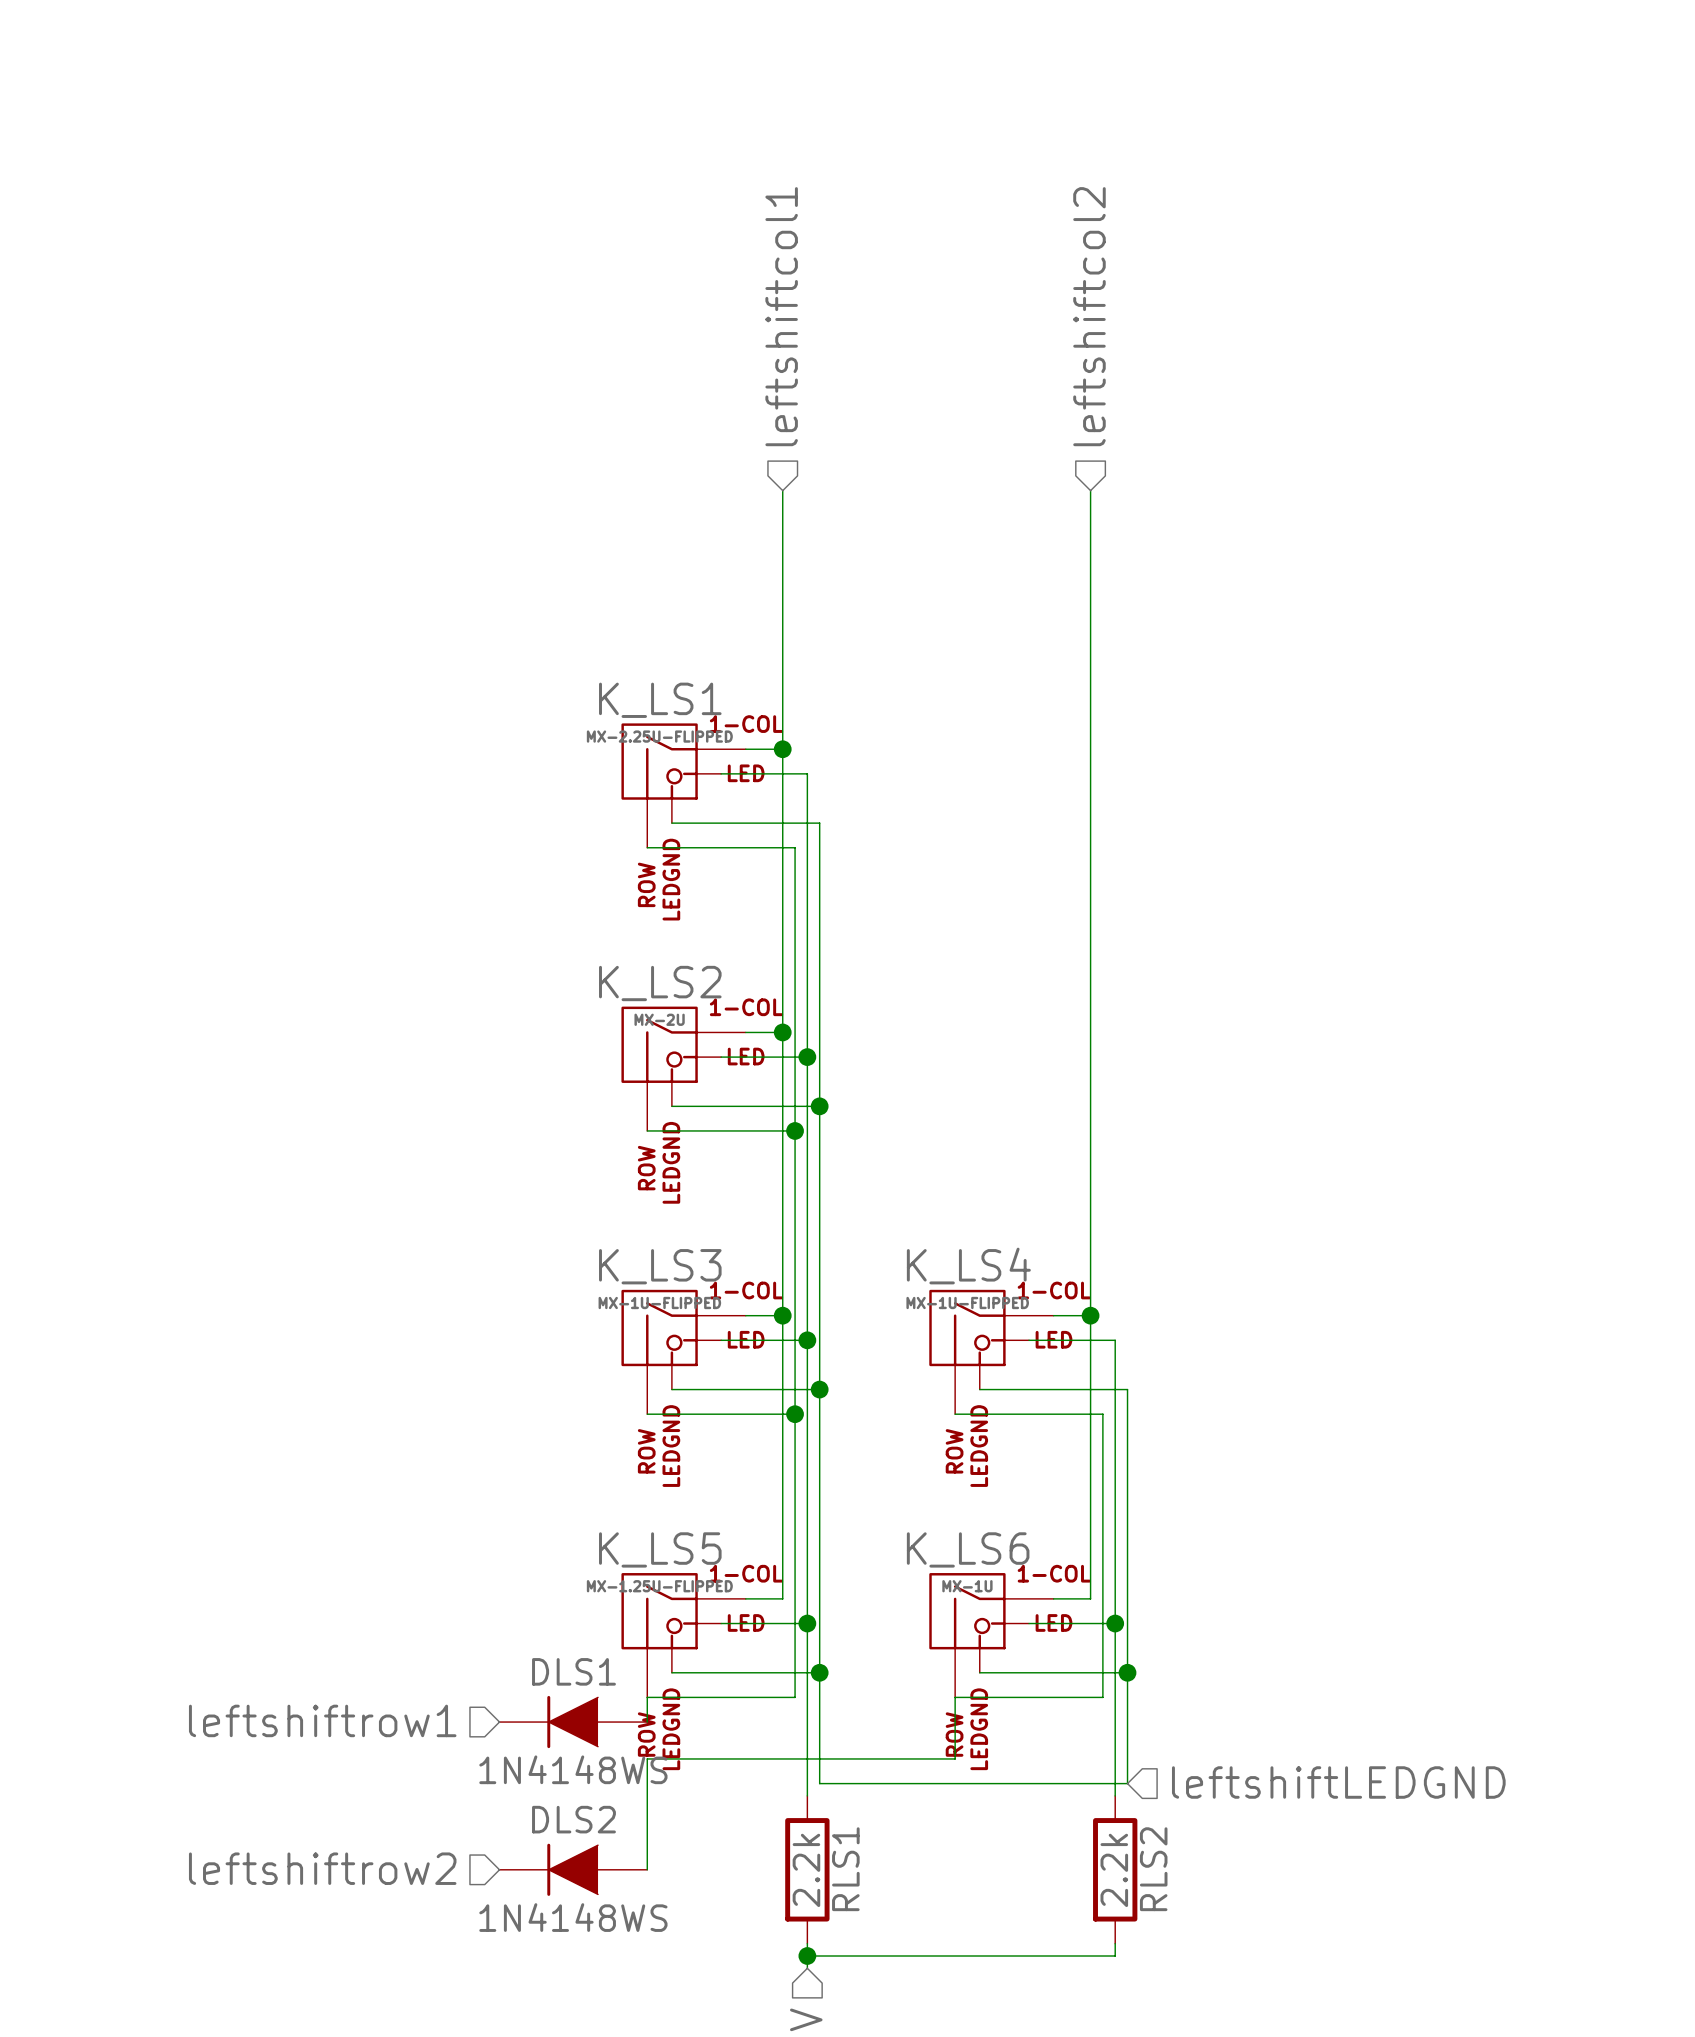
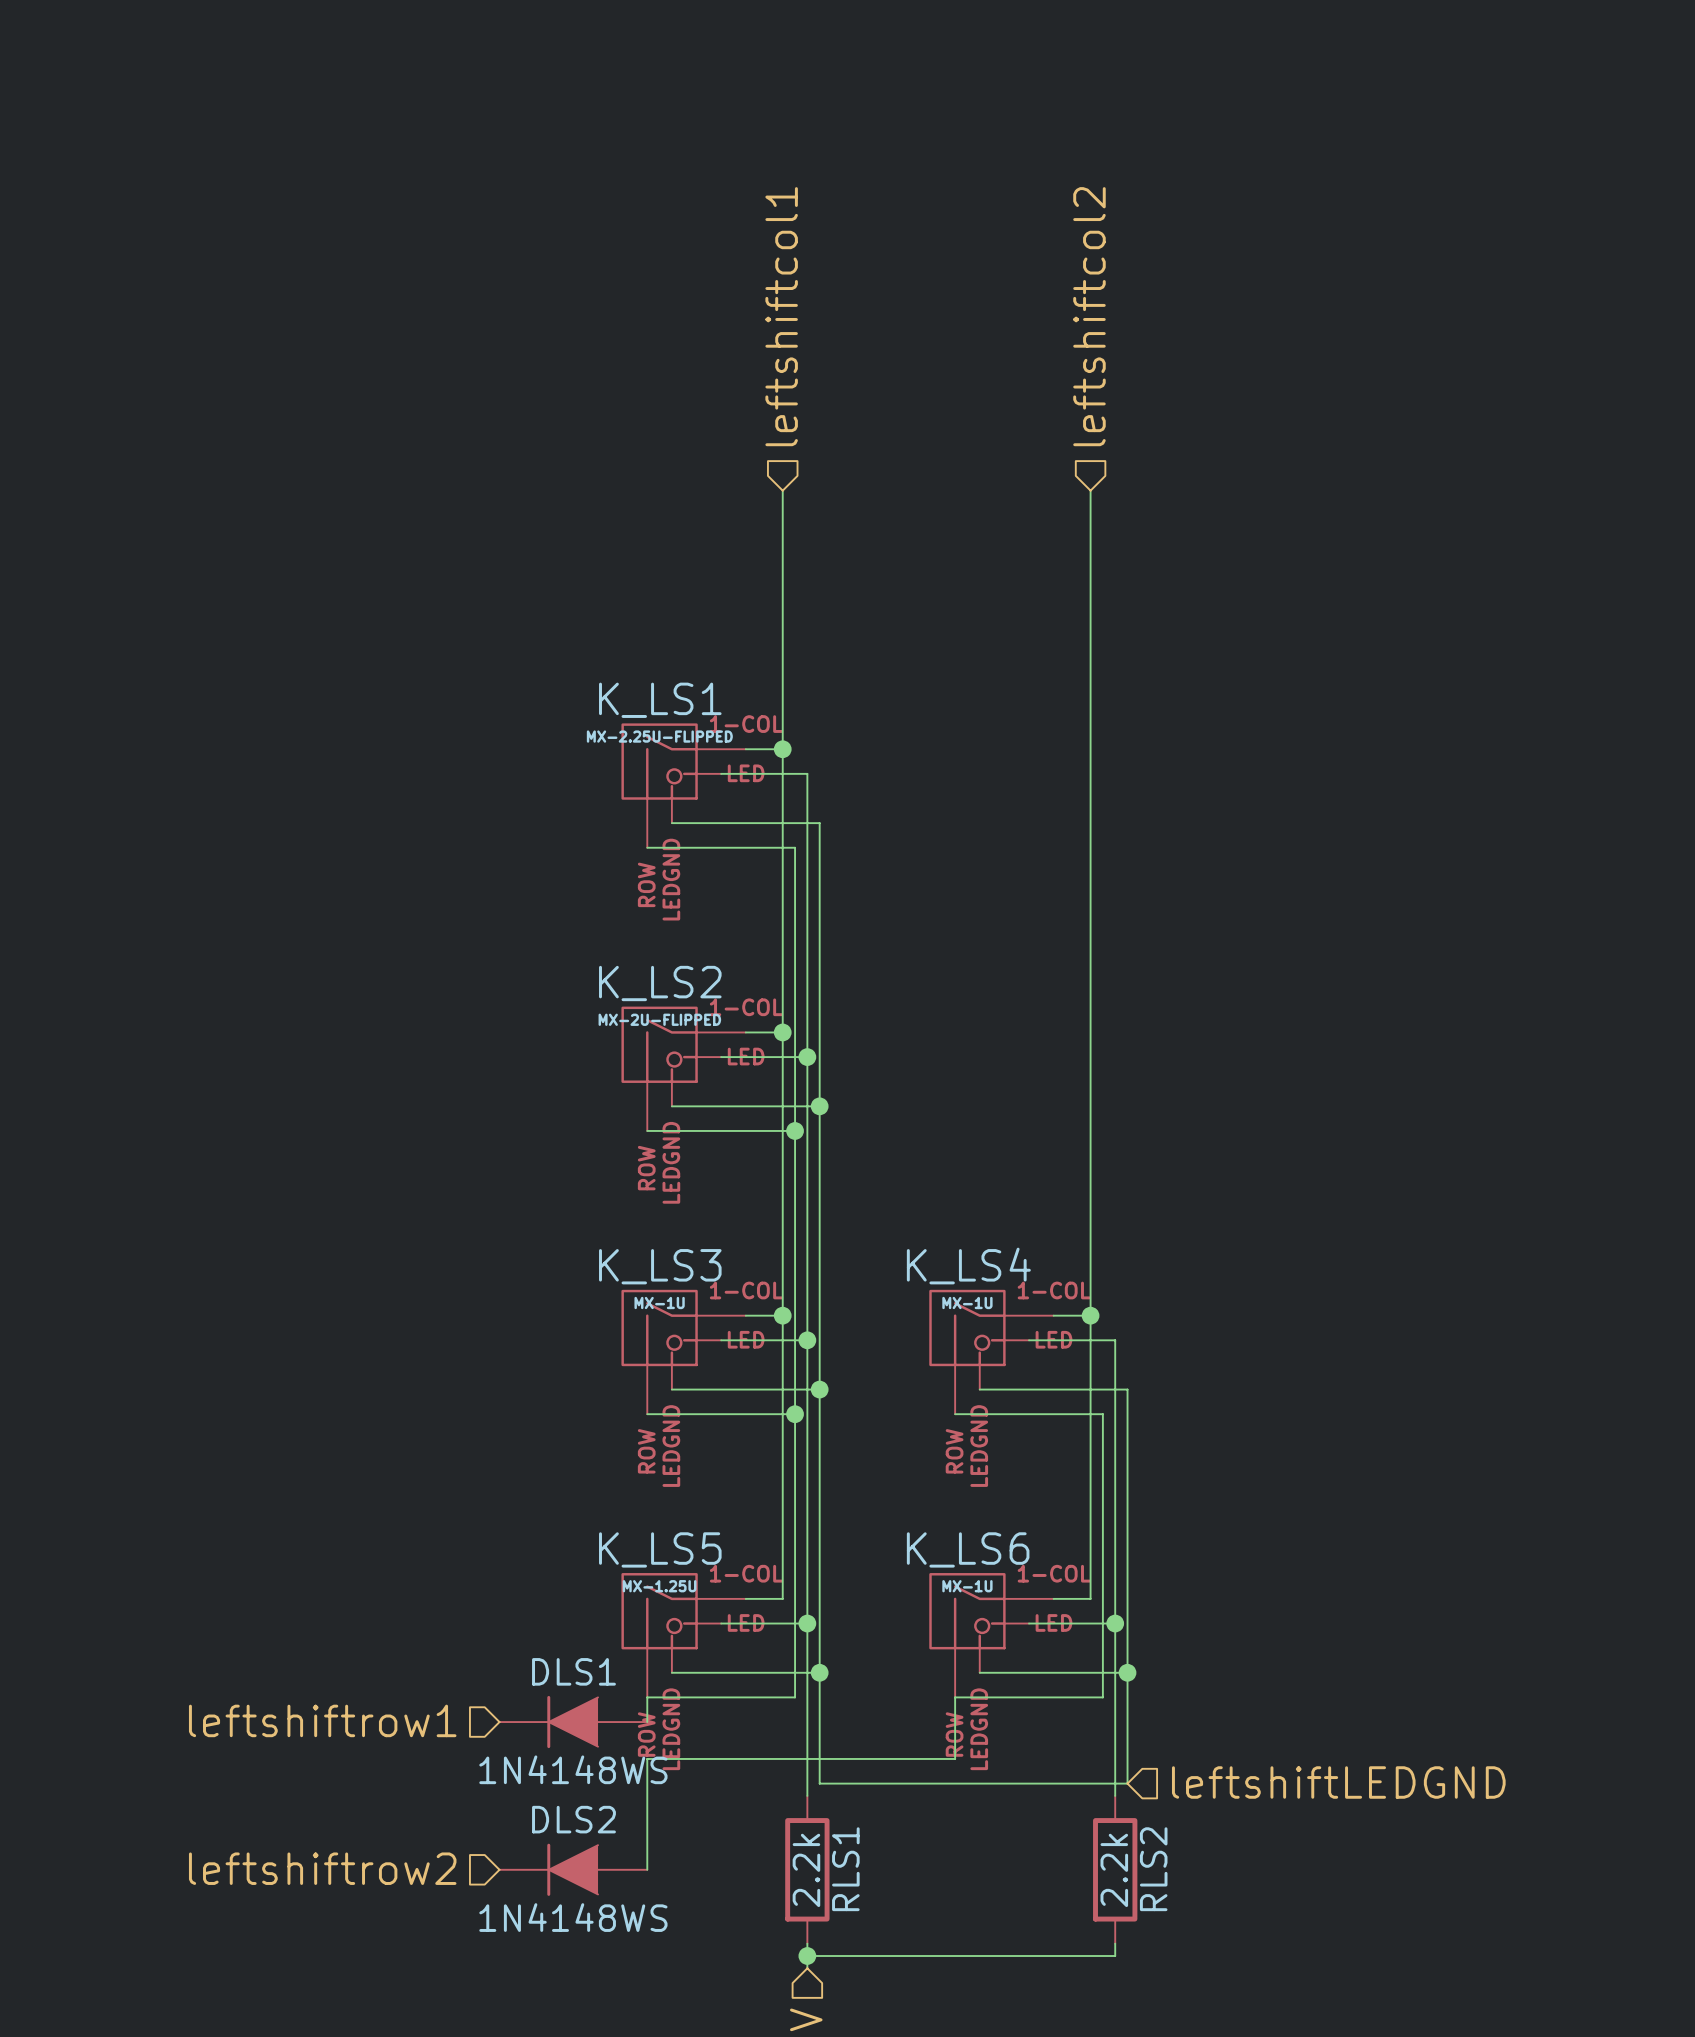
K_LS2 value: MX-2U (659, 1019) -> MX-2U-FLIPPED (659, 1019)
K_LS3 value: MX-1U-FLIPPED (659, 1303) -> MX-1U (659, 1303)
K_LS4 value: MX-1U-FLIPPED (967, 1303) -> MX-1U (967, 1303)
K_LS5 value: MX-1.25U-FLIPPED (659, 1586) -> MX-1.25U (659, 1586)

